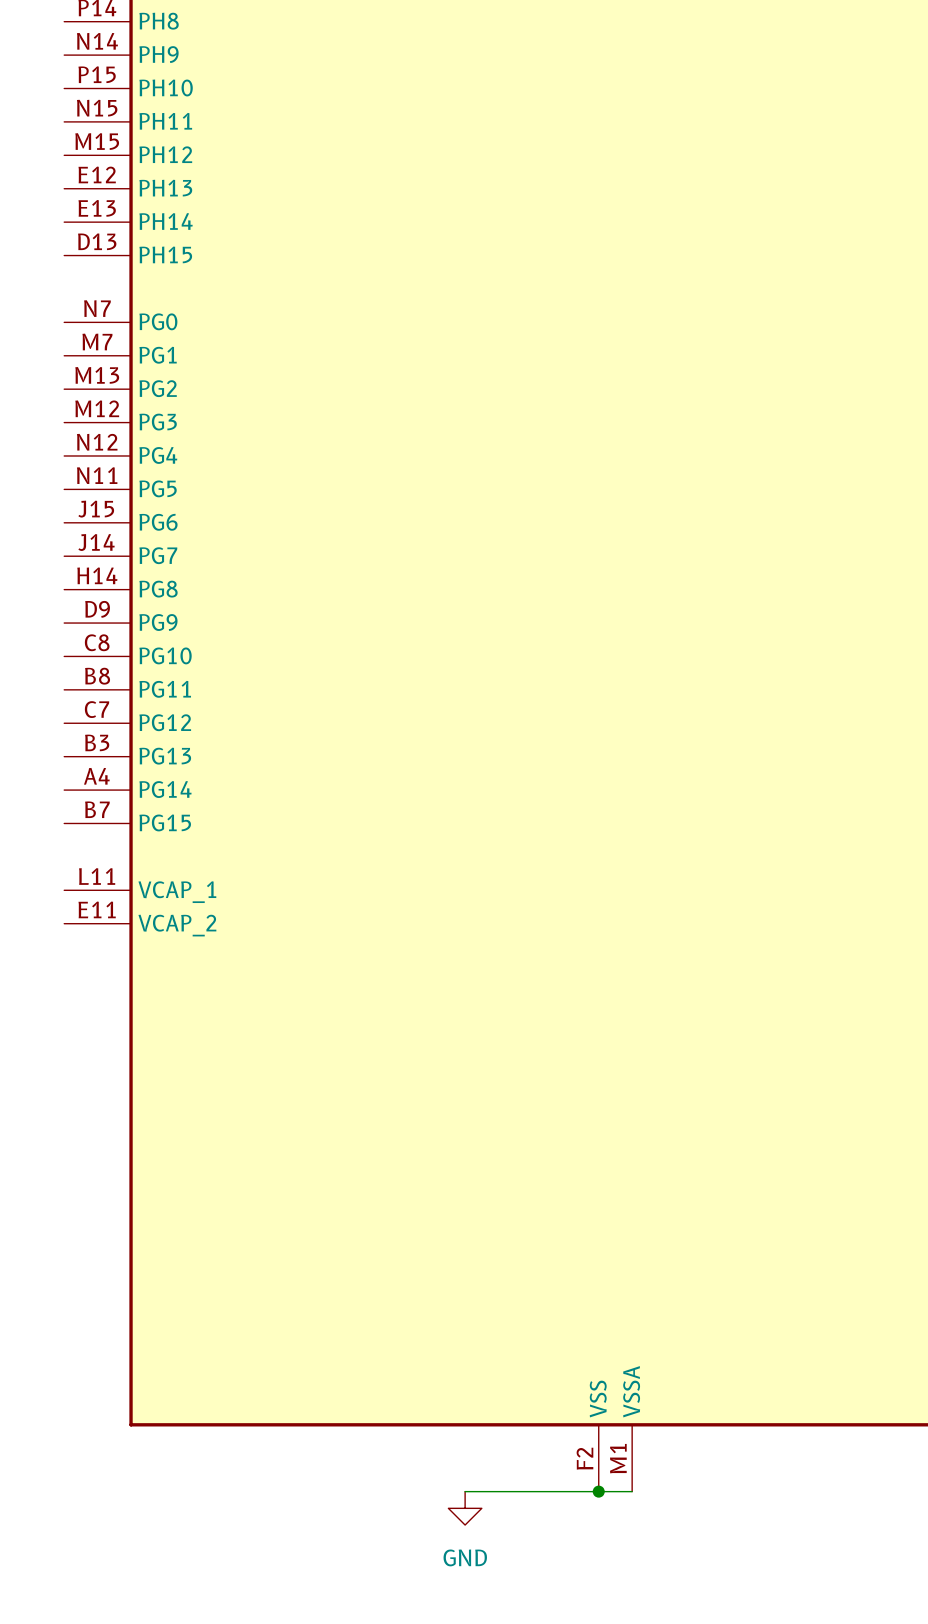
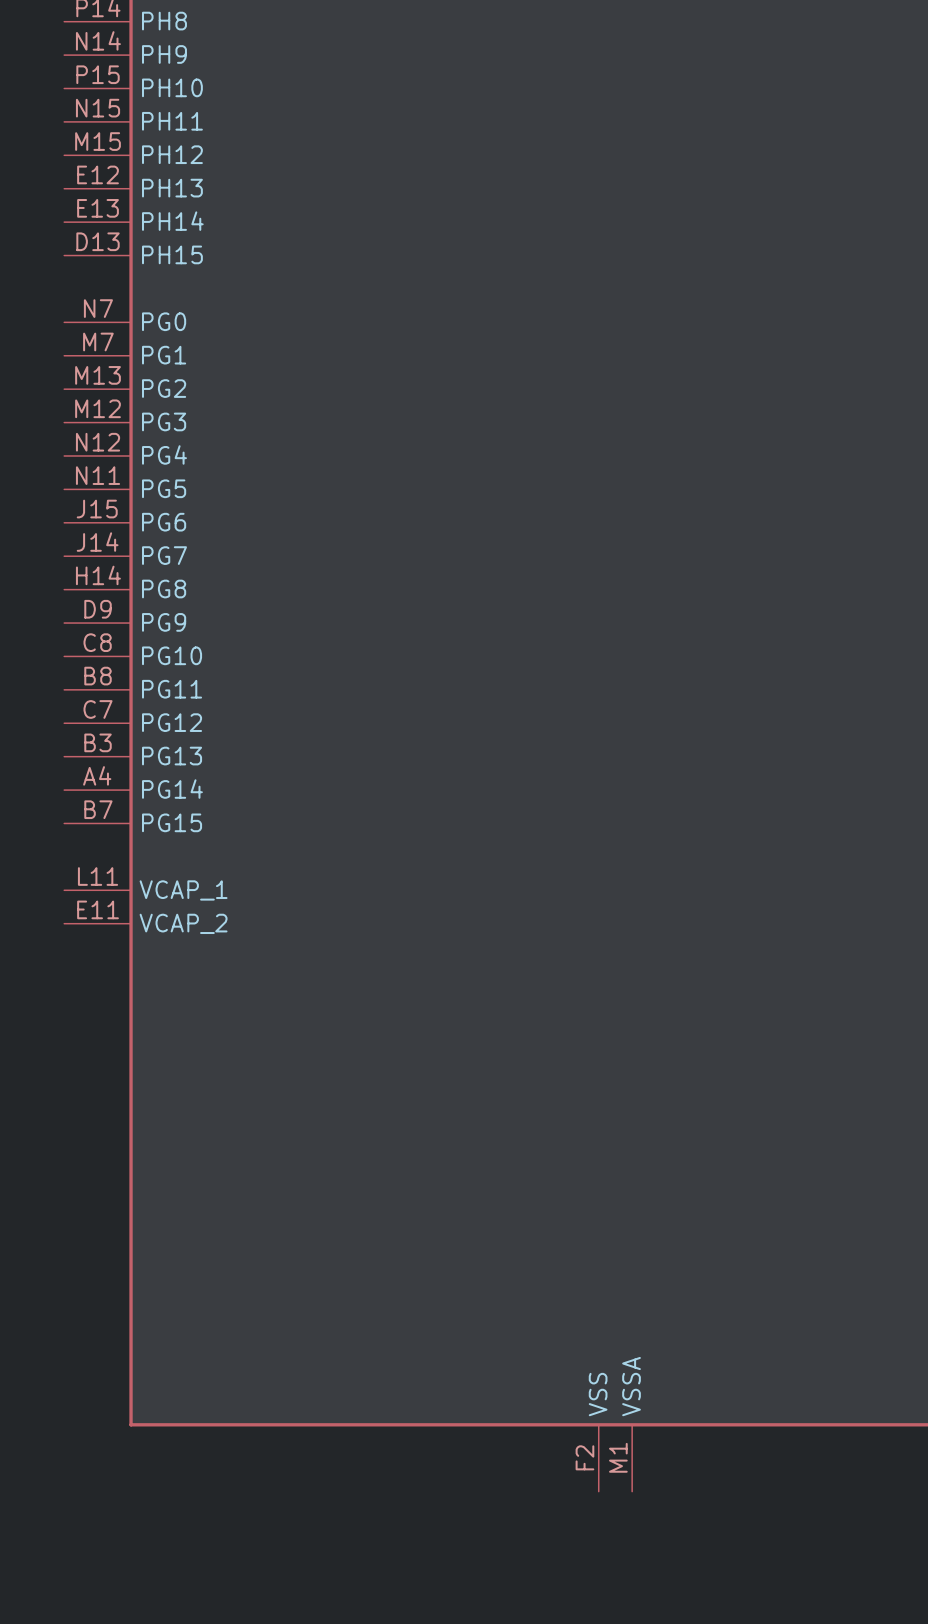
wire: (465, 1491) (632, 1491) -> none
junction: (598, 1491) -> none
power symbol: GND (465, 1508) -> none

